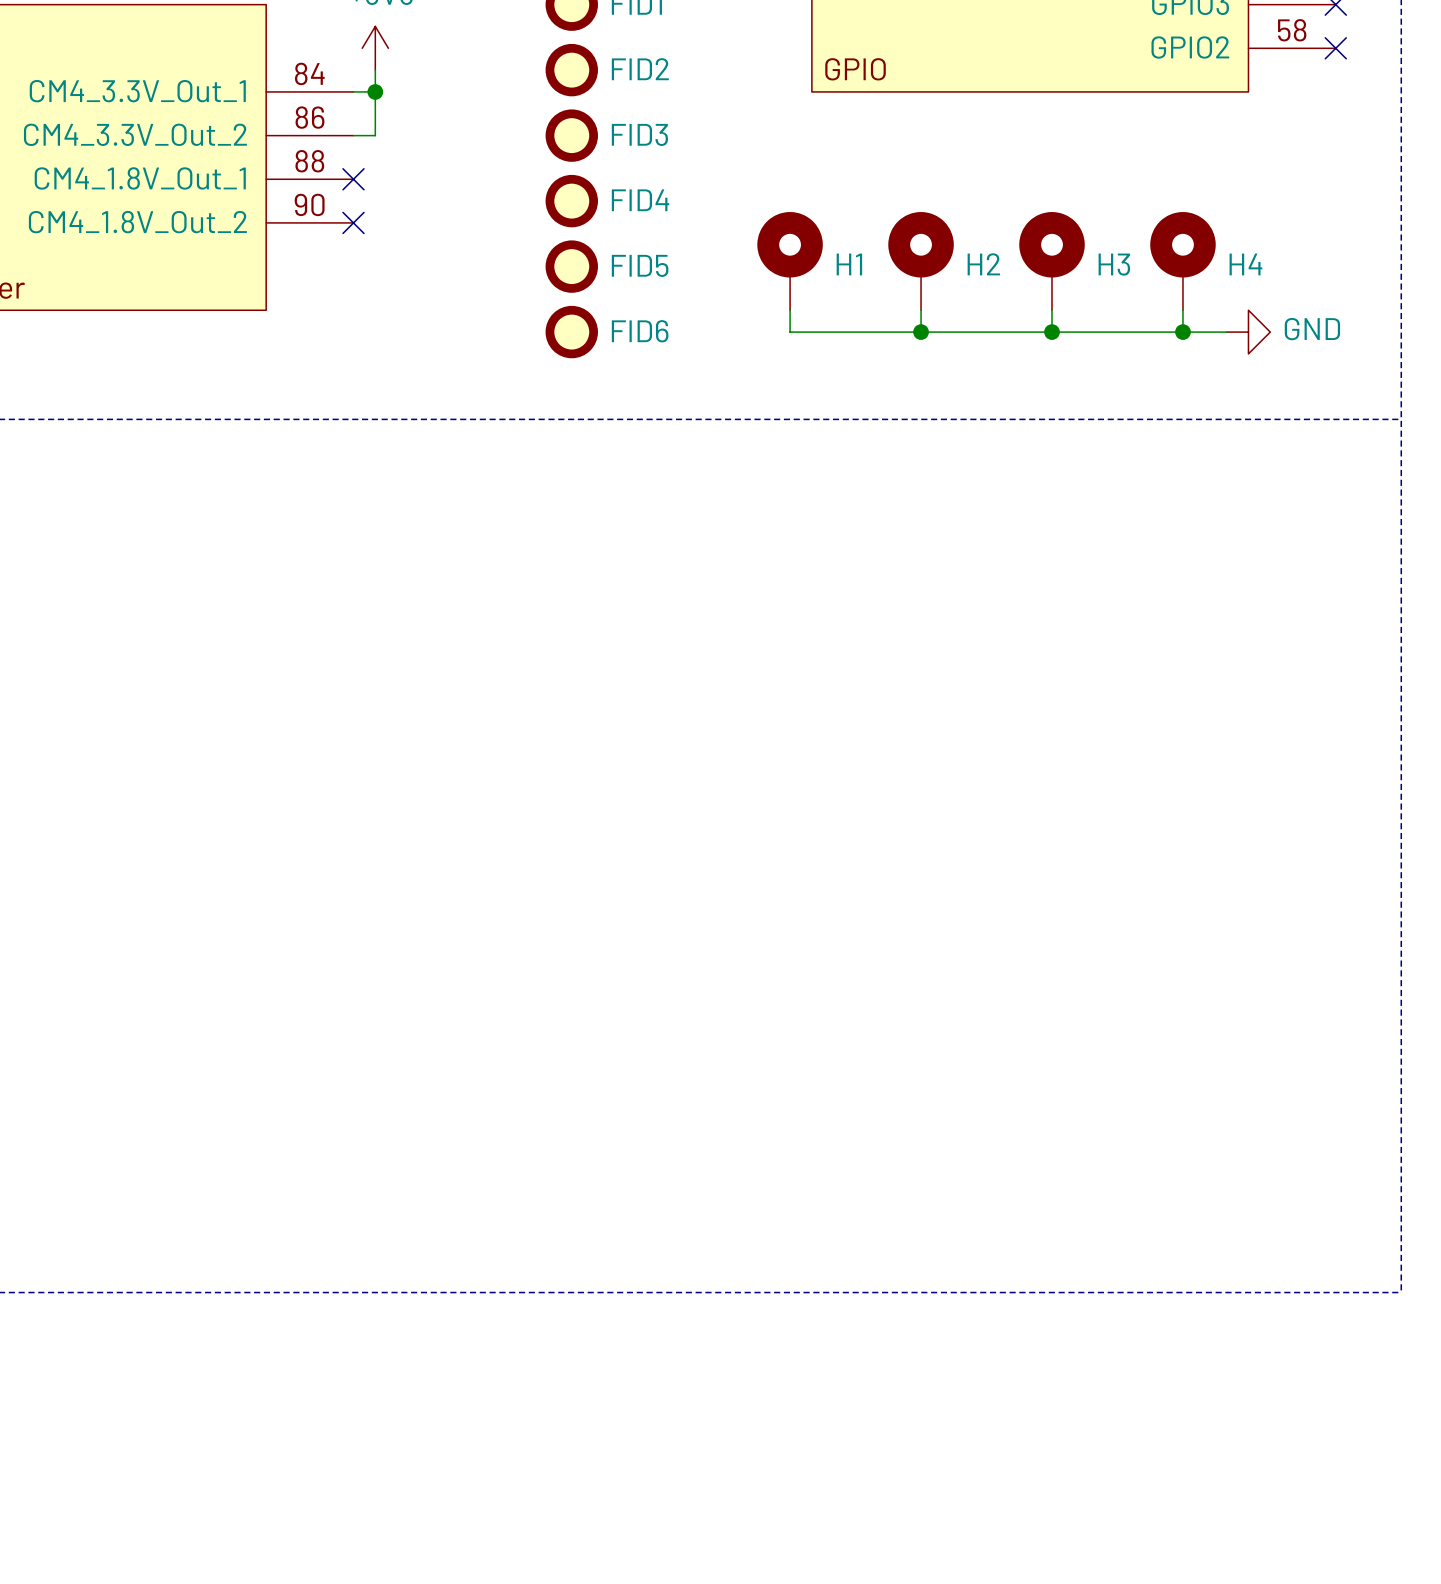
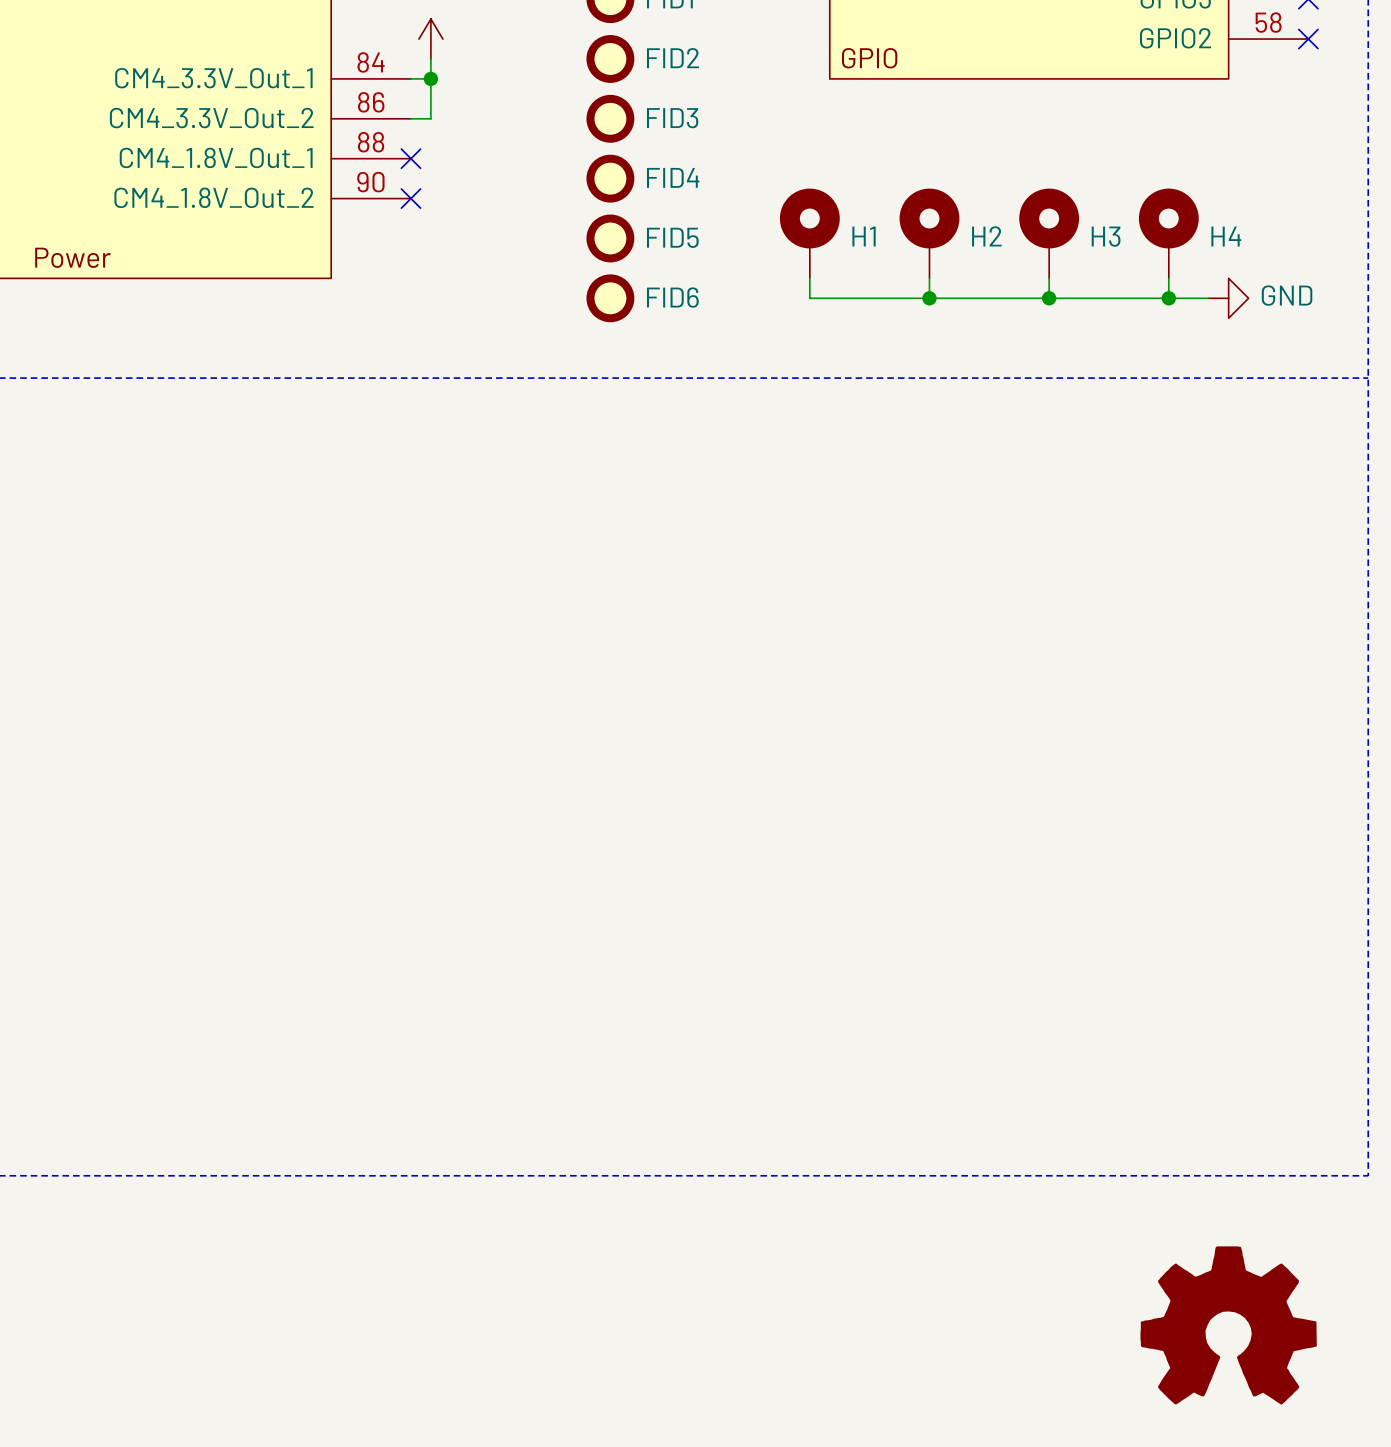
part: none -> (1228, 1325)

